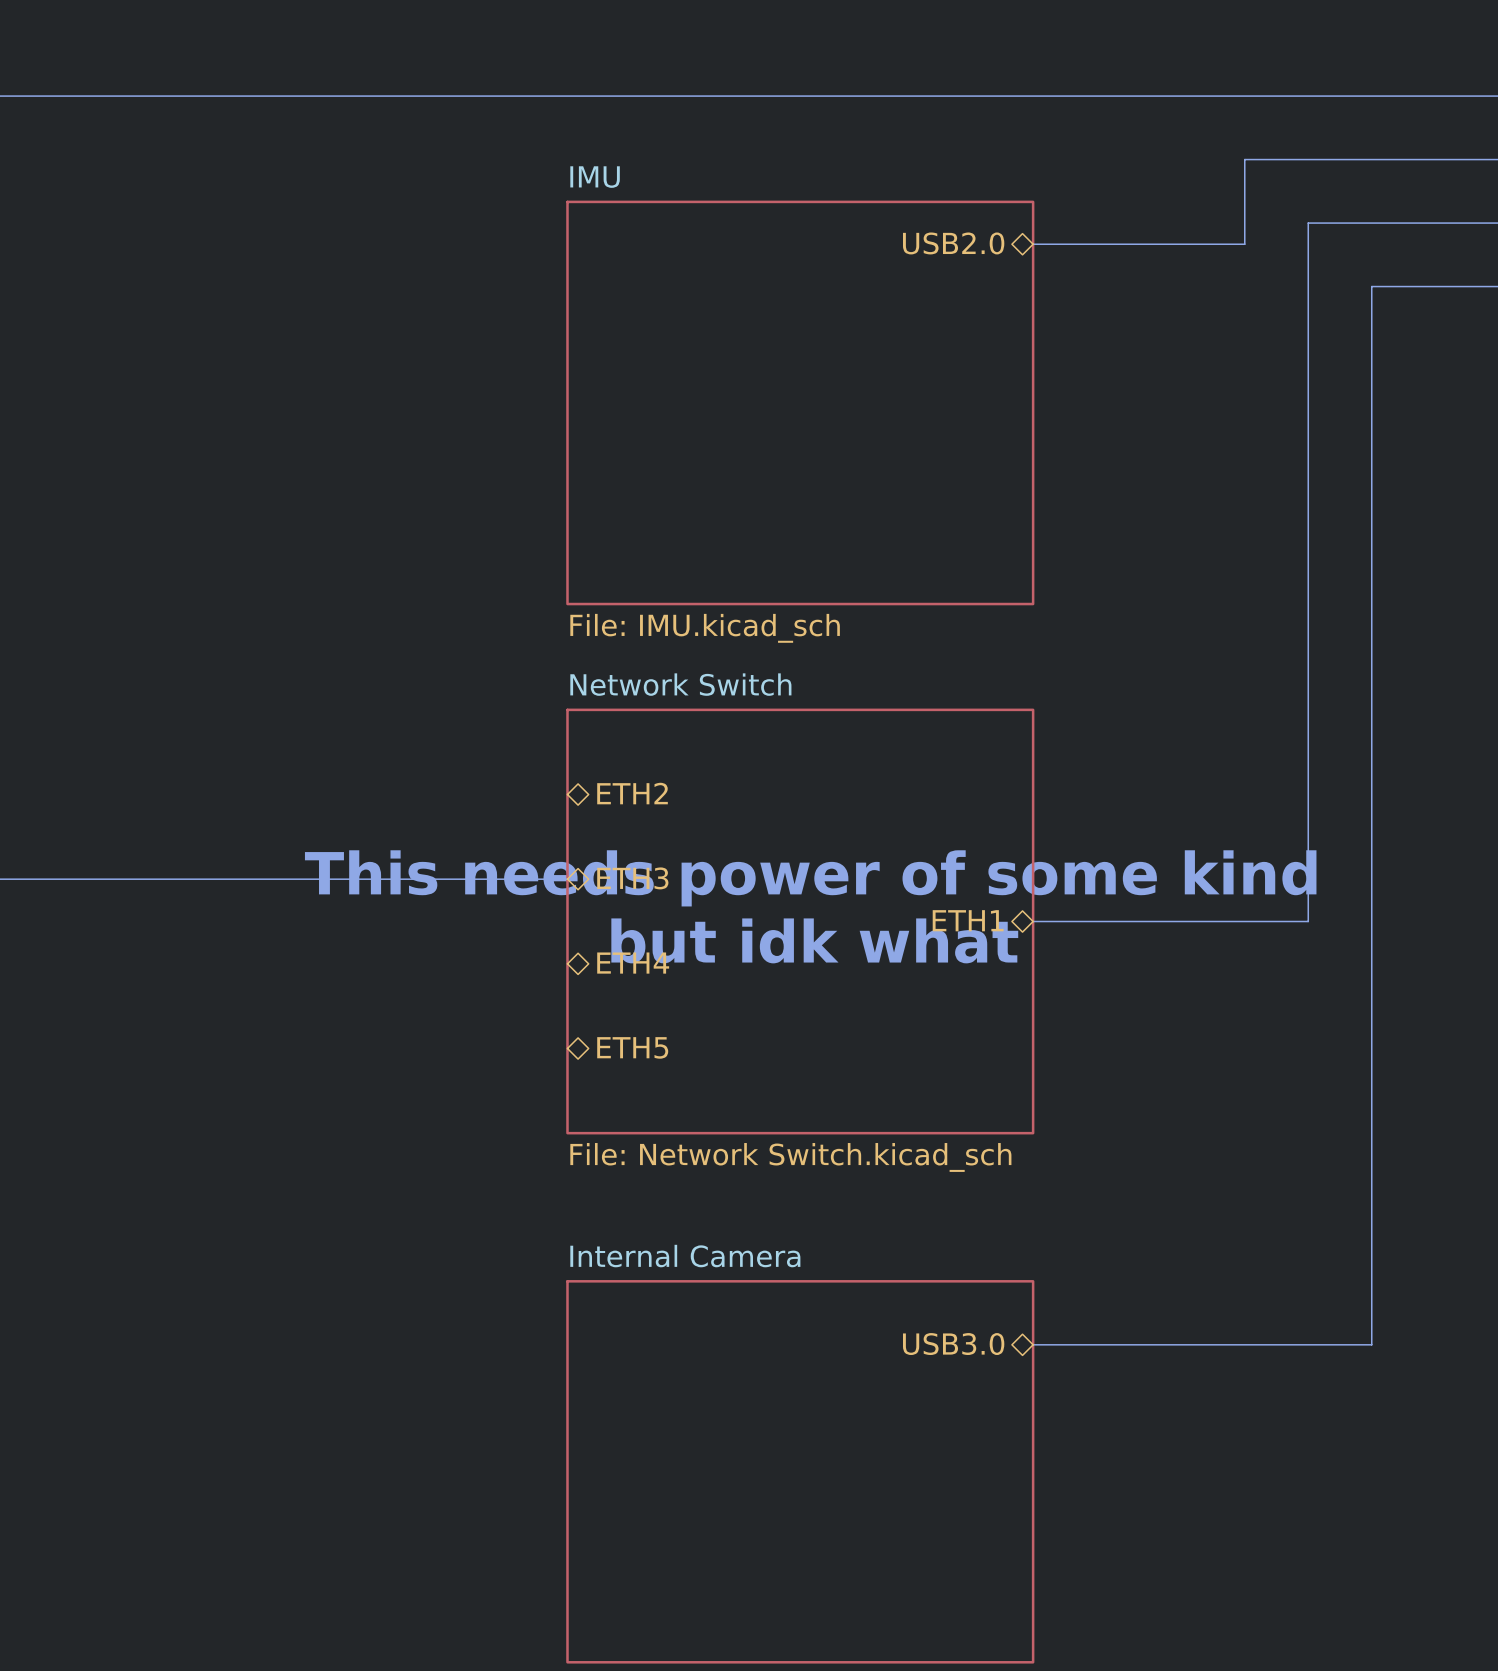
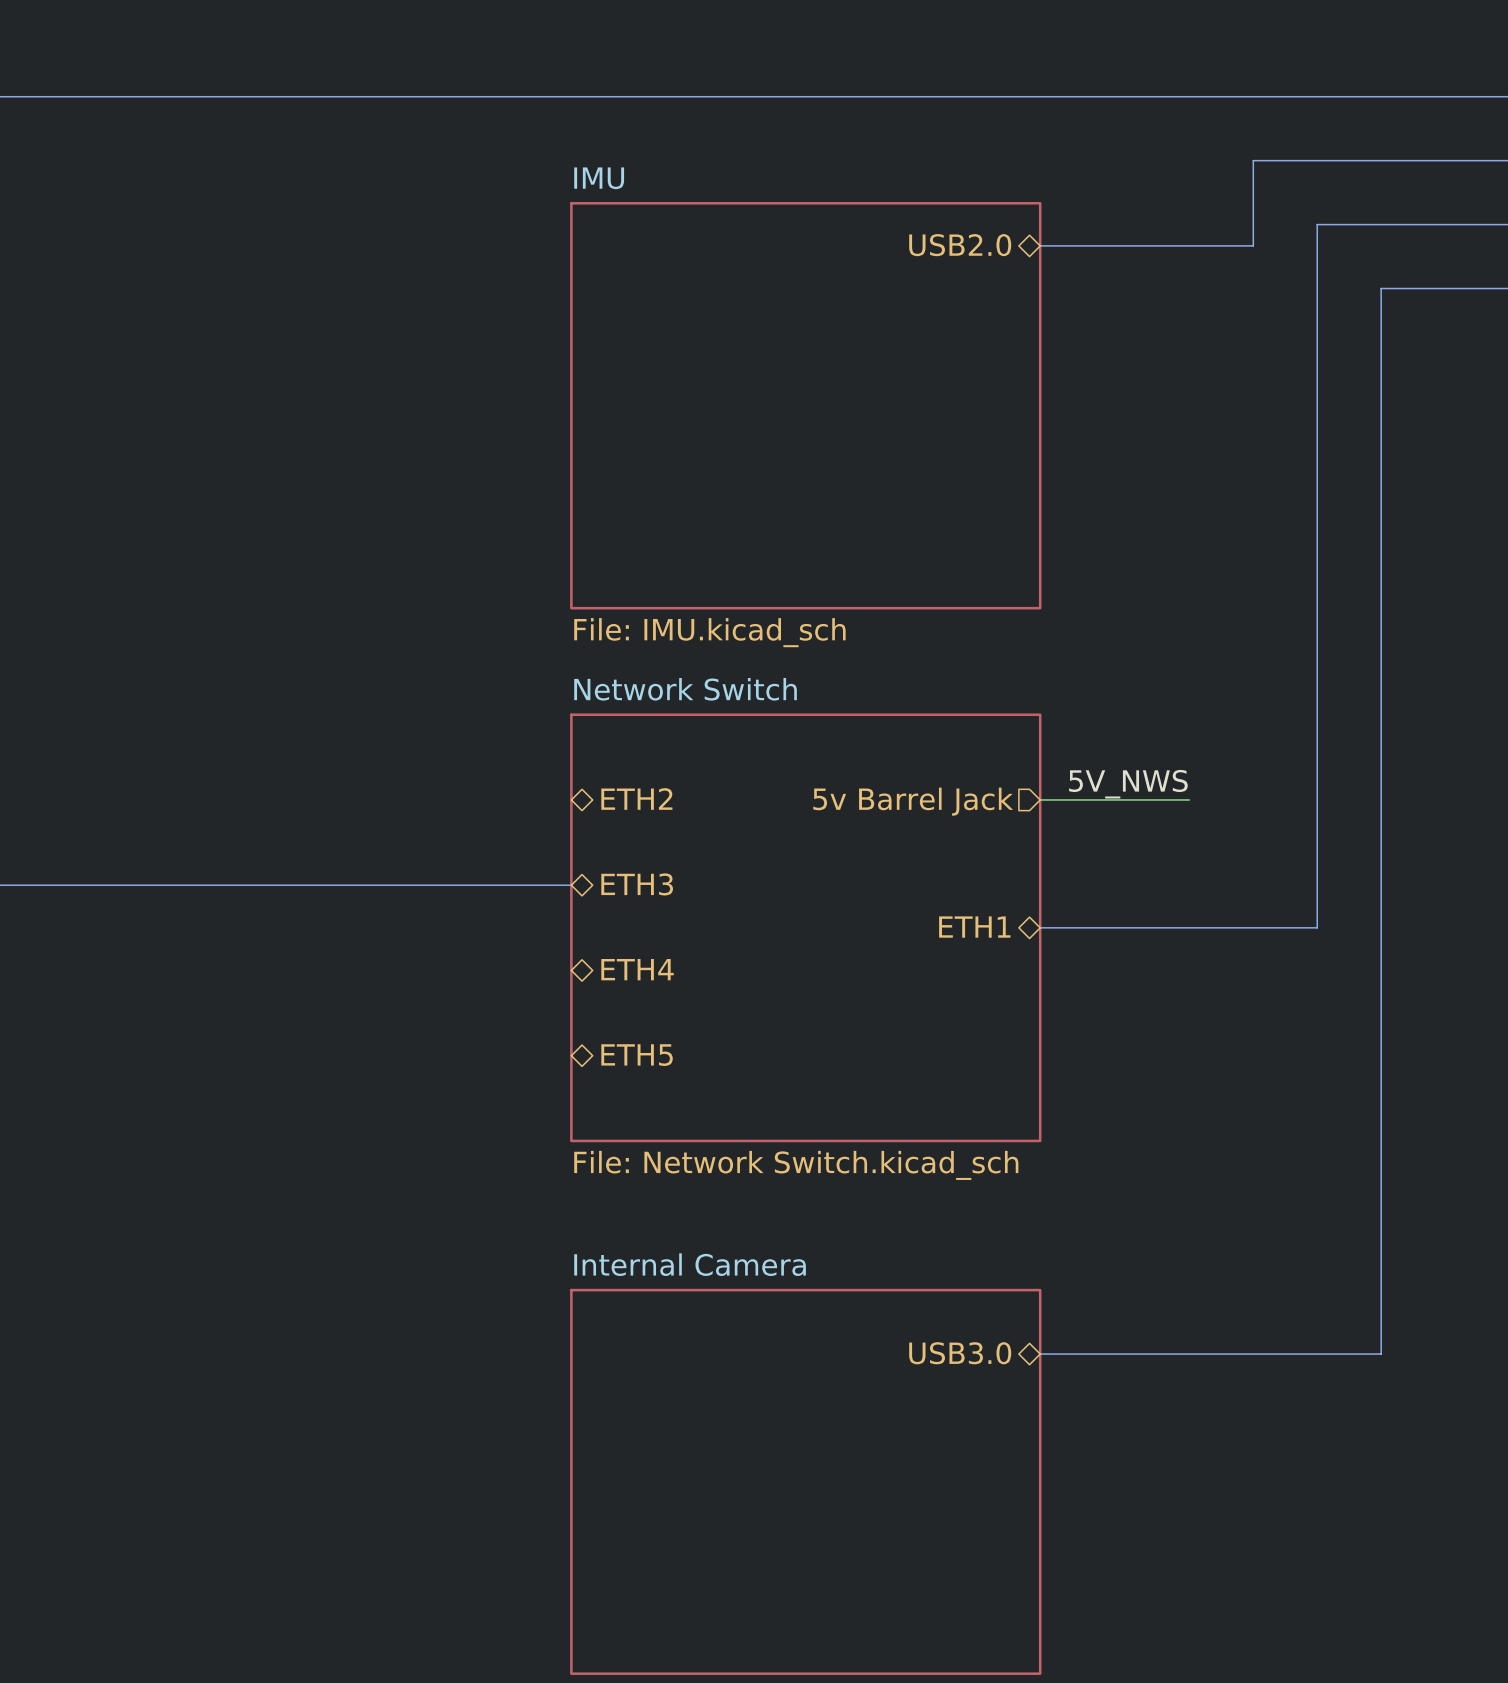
label: none -> 5V_NWS (1128, 784)
wire: none -> (1040, 799) (1189, 799)
hierarchical label: none -> 5v Barrel Jack (913, 801)
text: This needs power of some kind (810, 878) -> none
text: but idk what (814, 940) -> none

